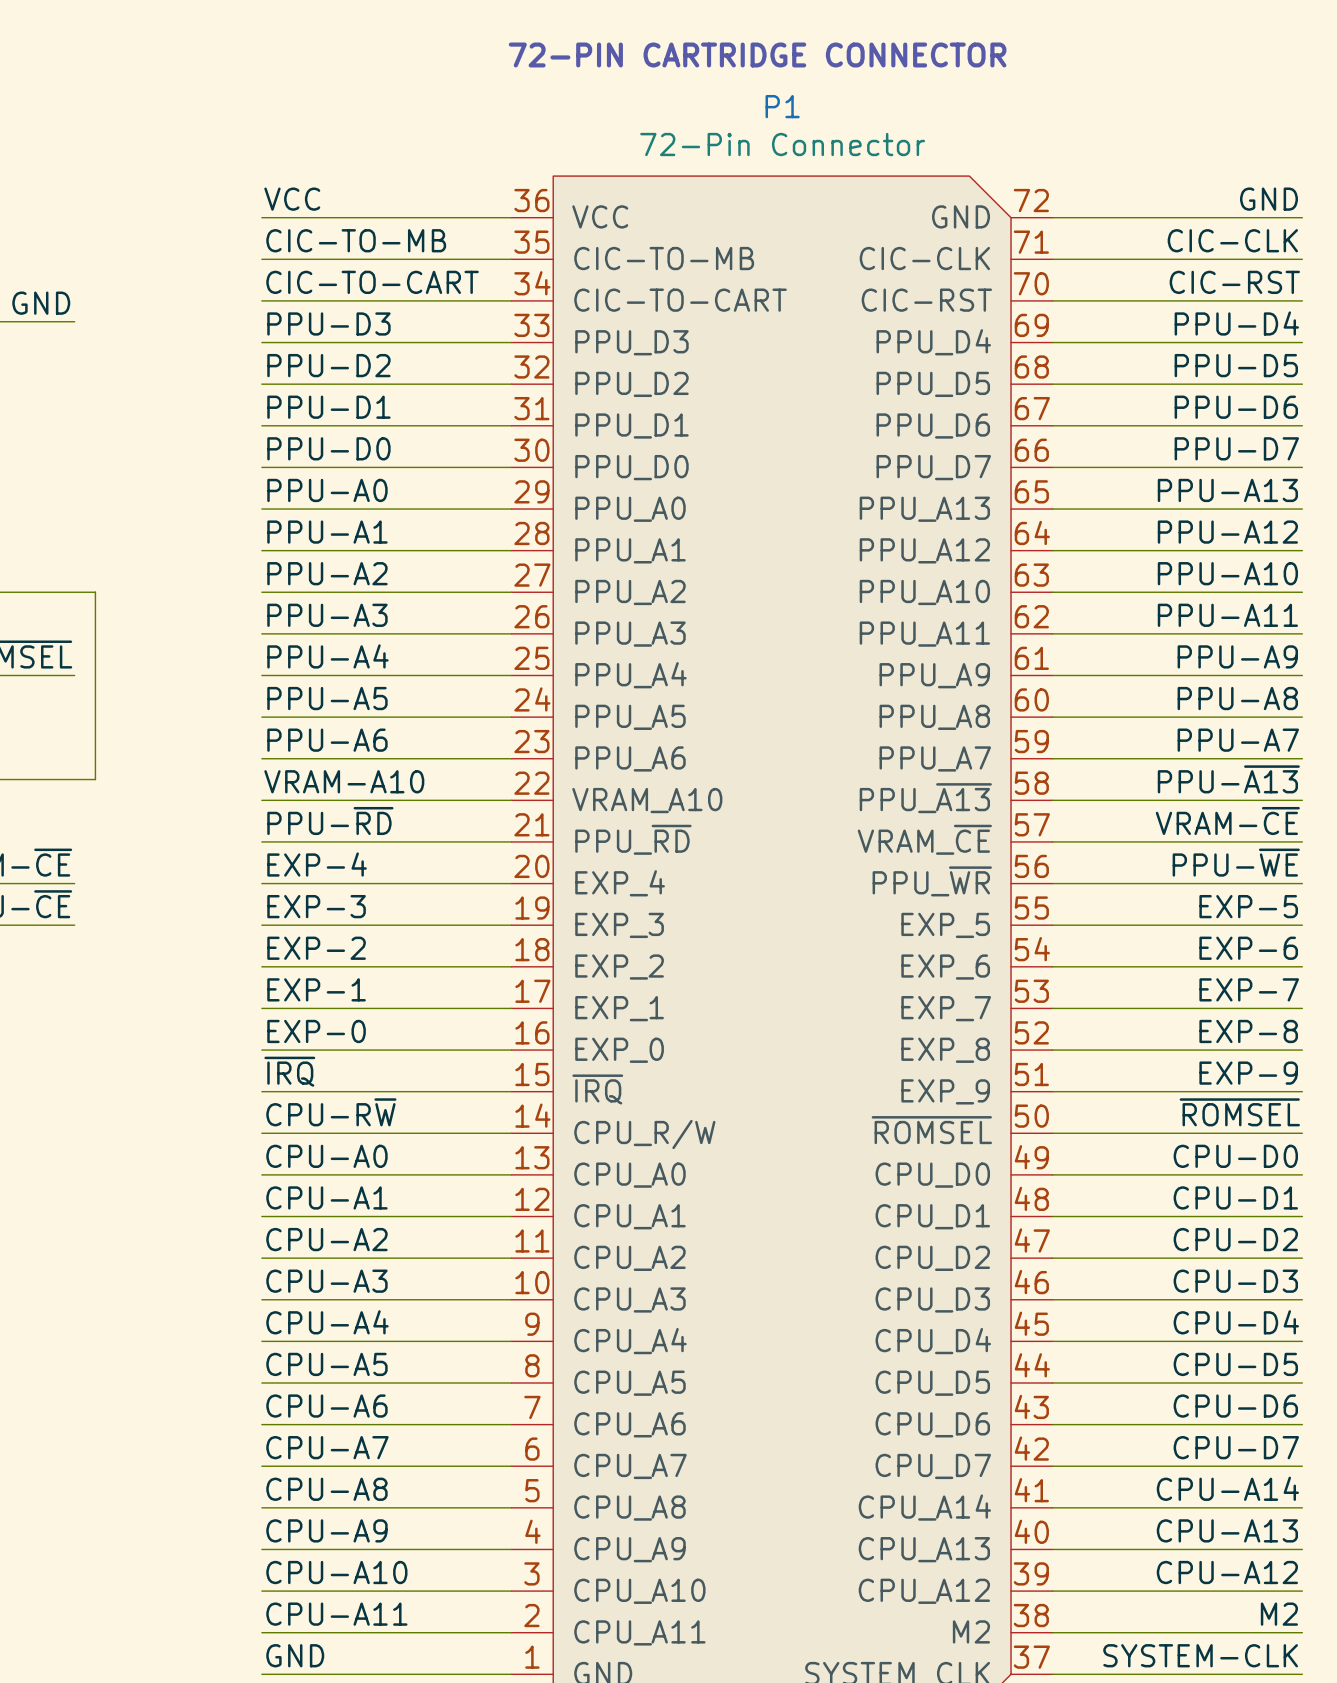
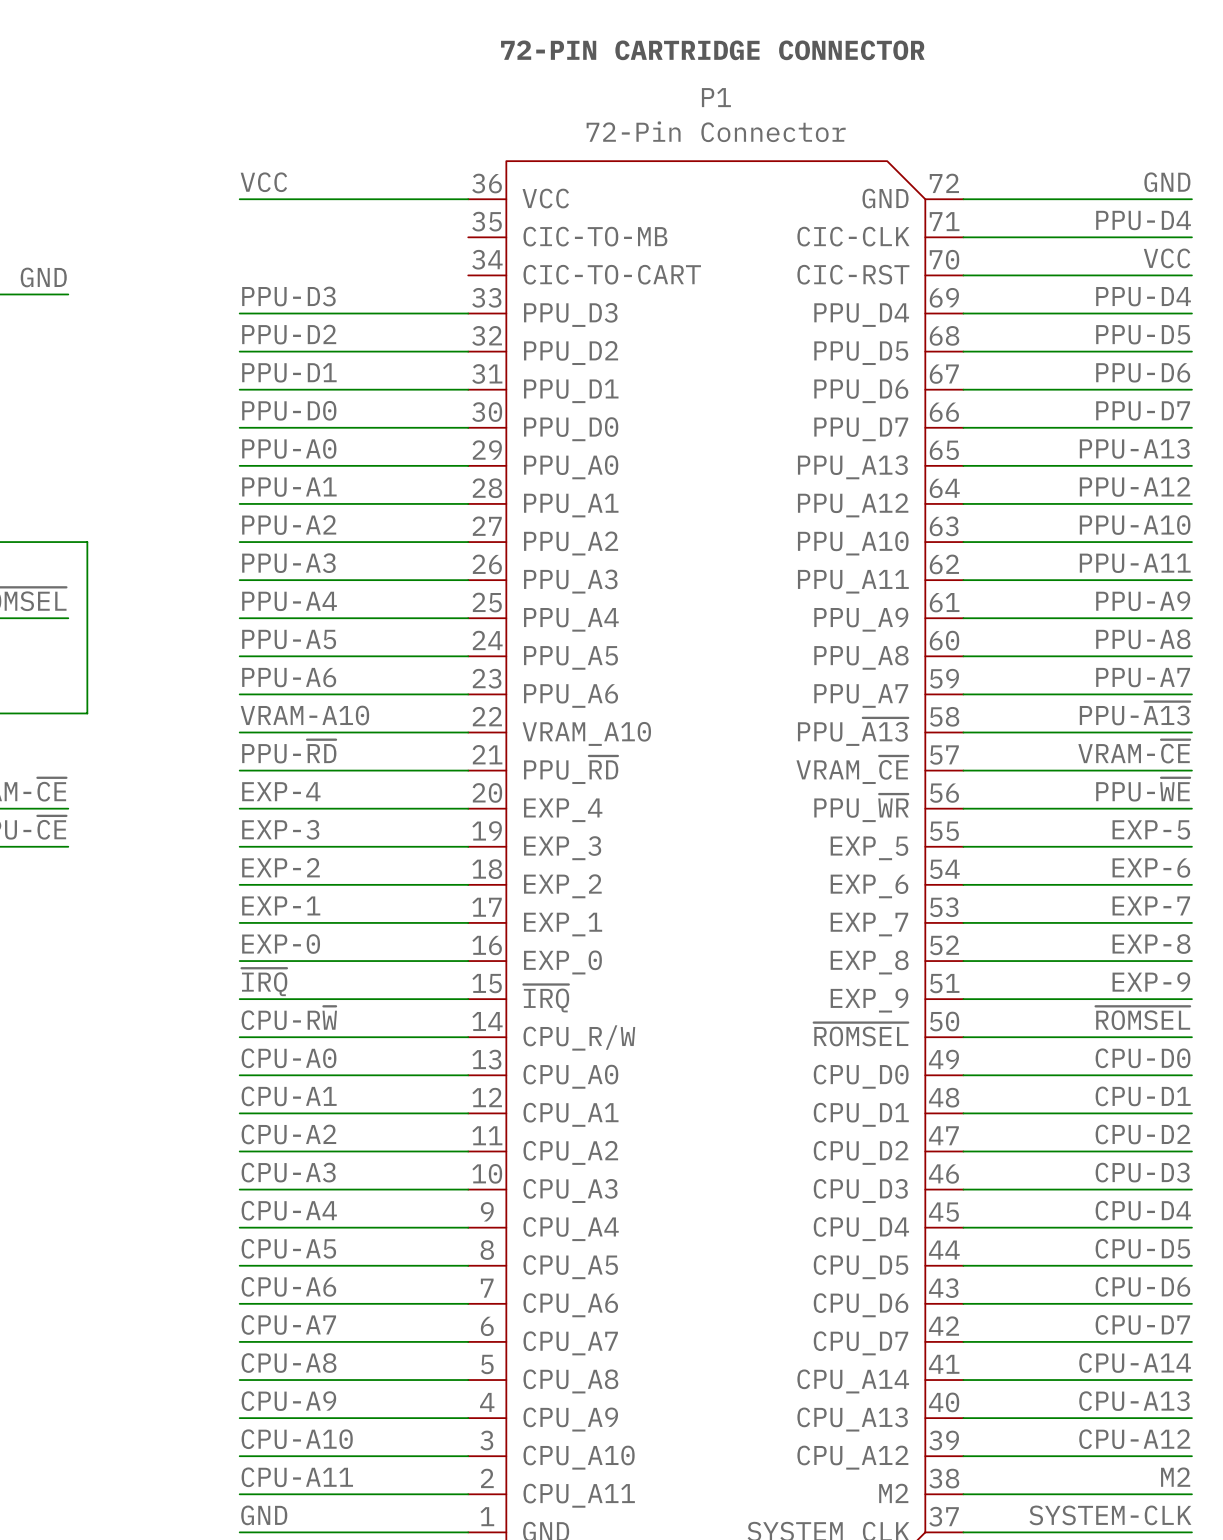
label: CIC-TO-MB (356, 240) -> none
label: CIC-CLK (1232, 240) -> PPU-D4 (1143, 220)
wire: (261, 259) (511, 259) -> none
label: CIC-TO-CART (372, 282) -> none
label: CIC-RST (1234, 282) -> VCC (1167, 258)
wire: (261, 300) (511, 300) -> none

